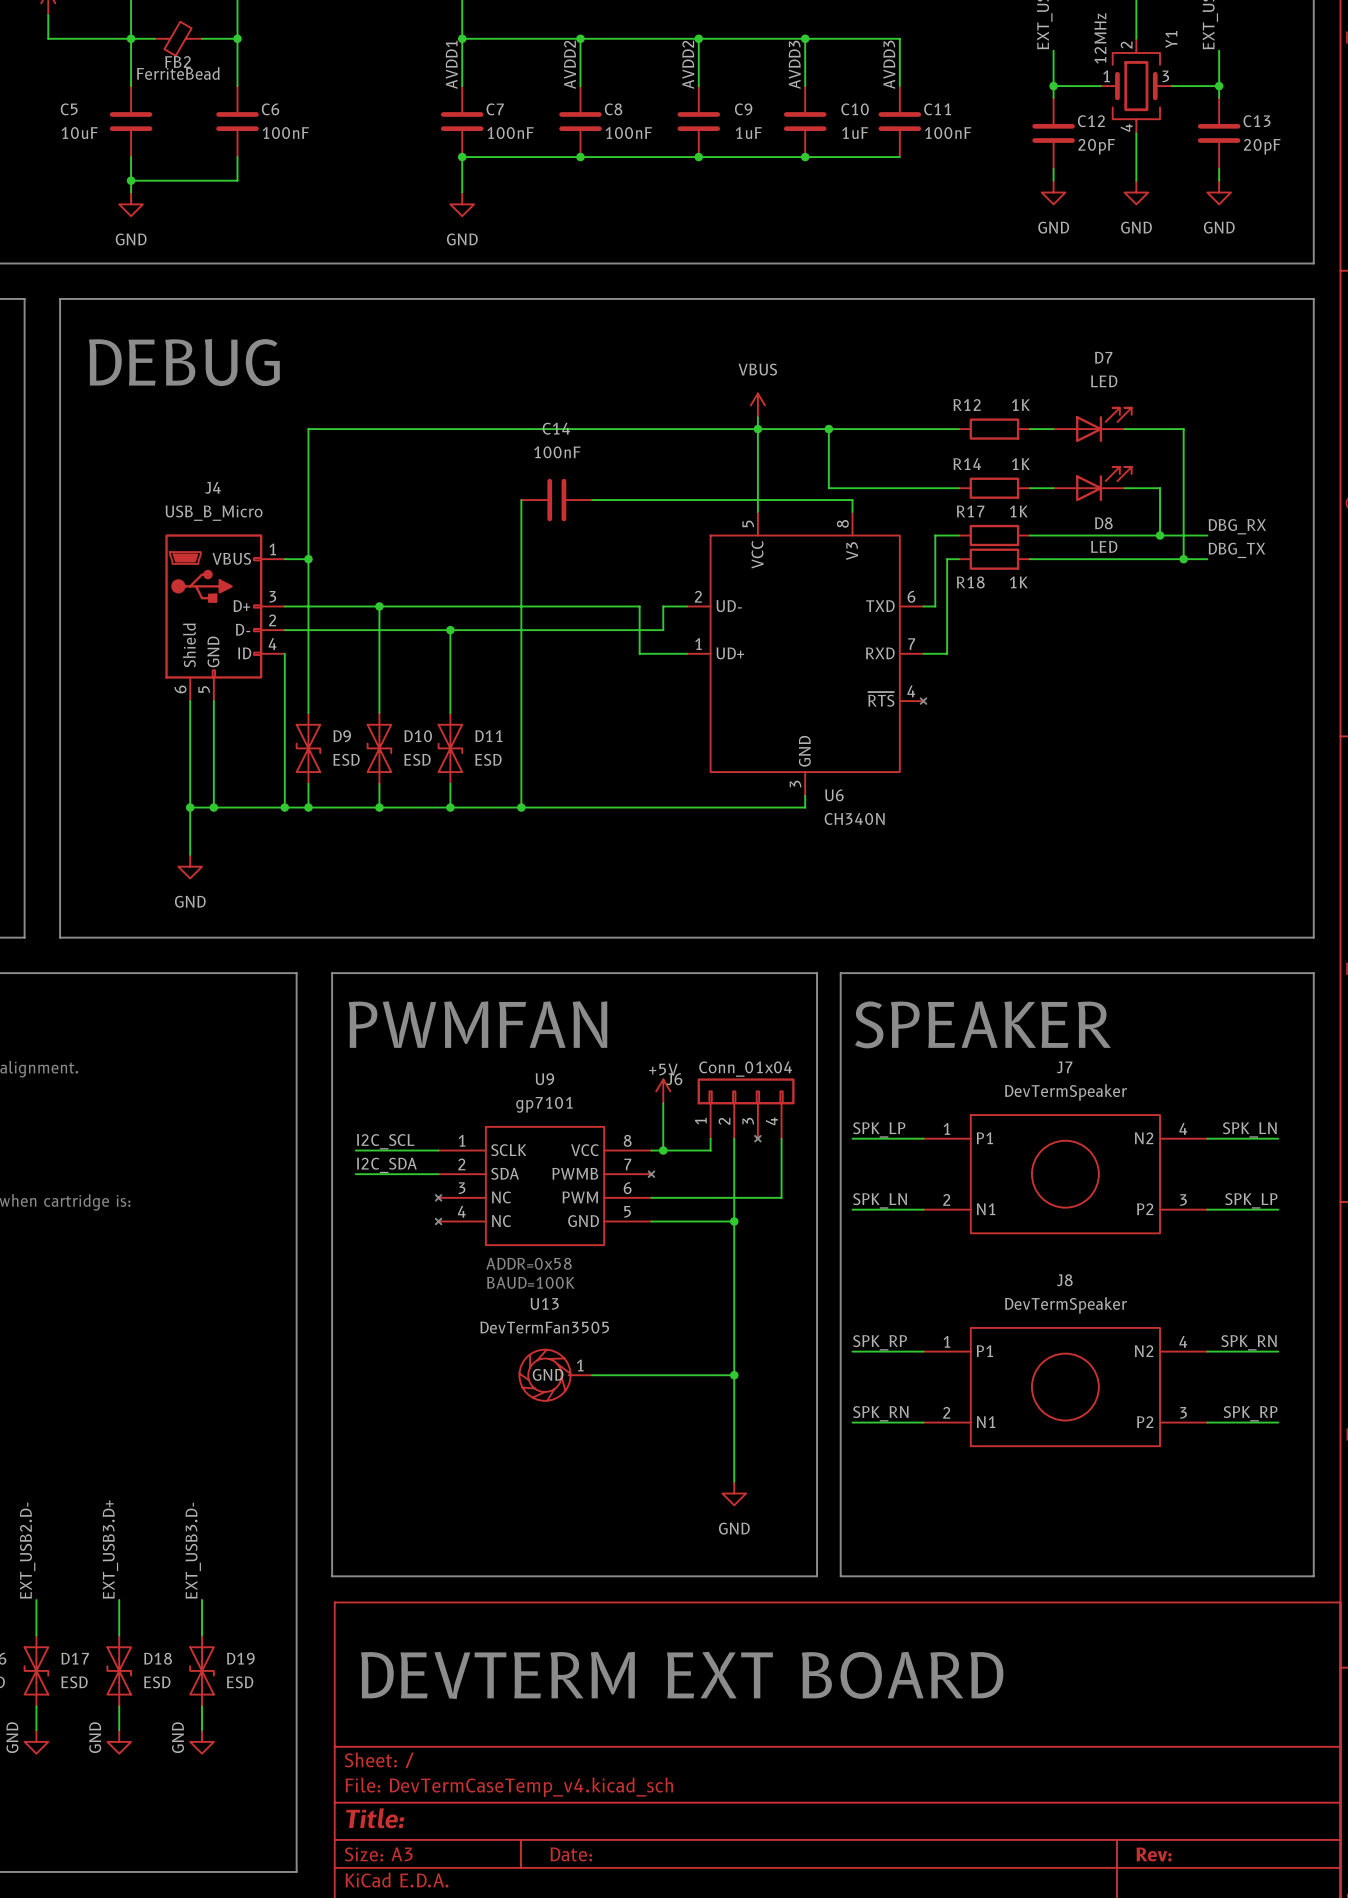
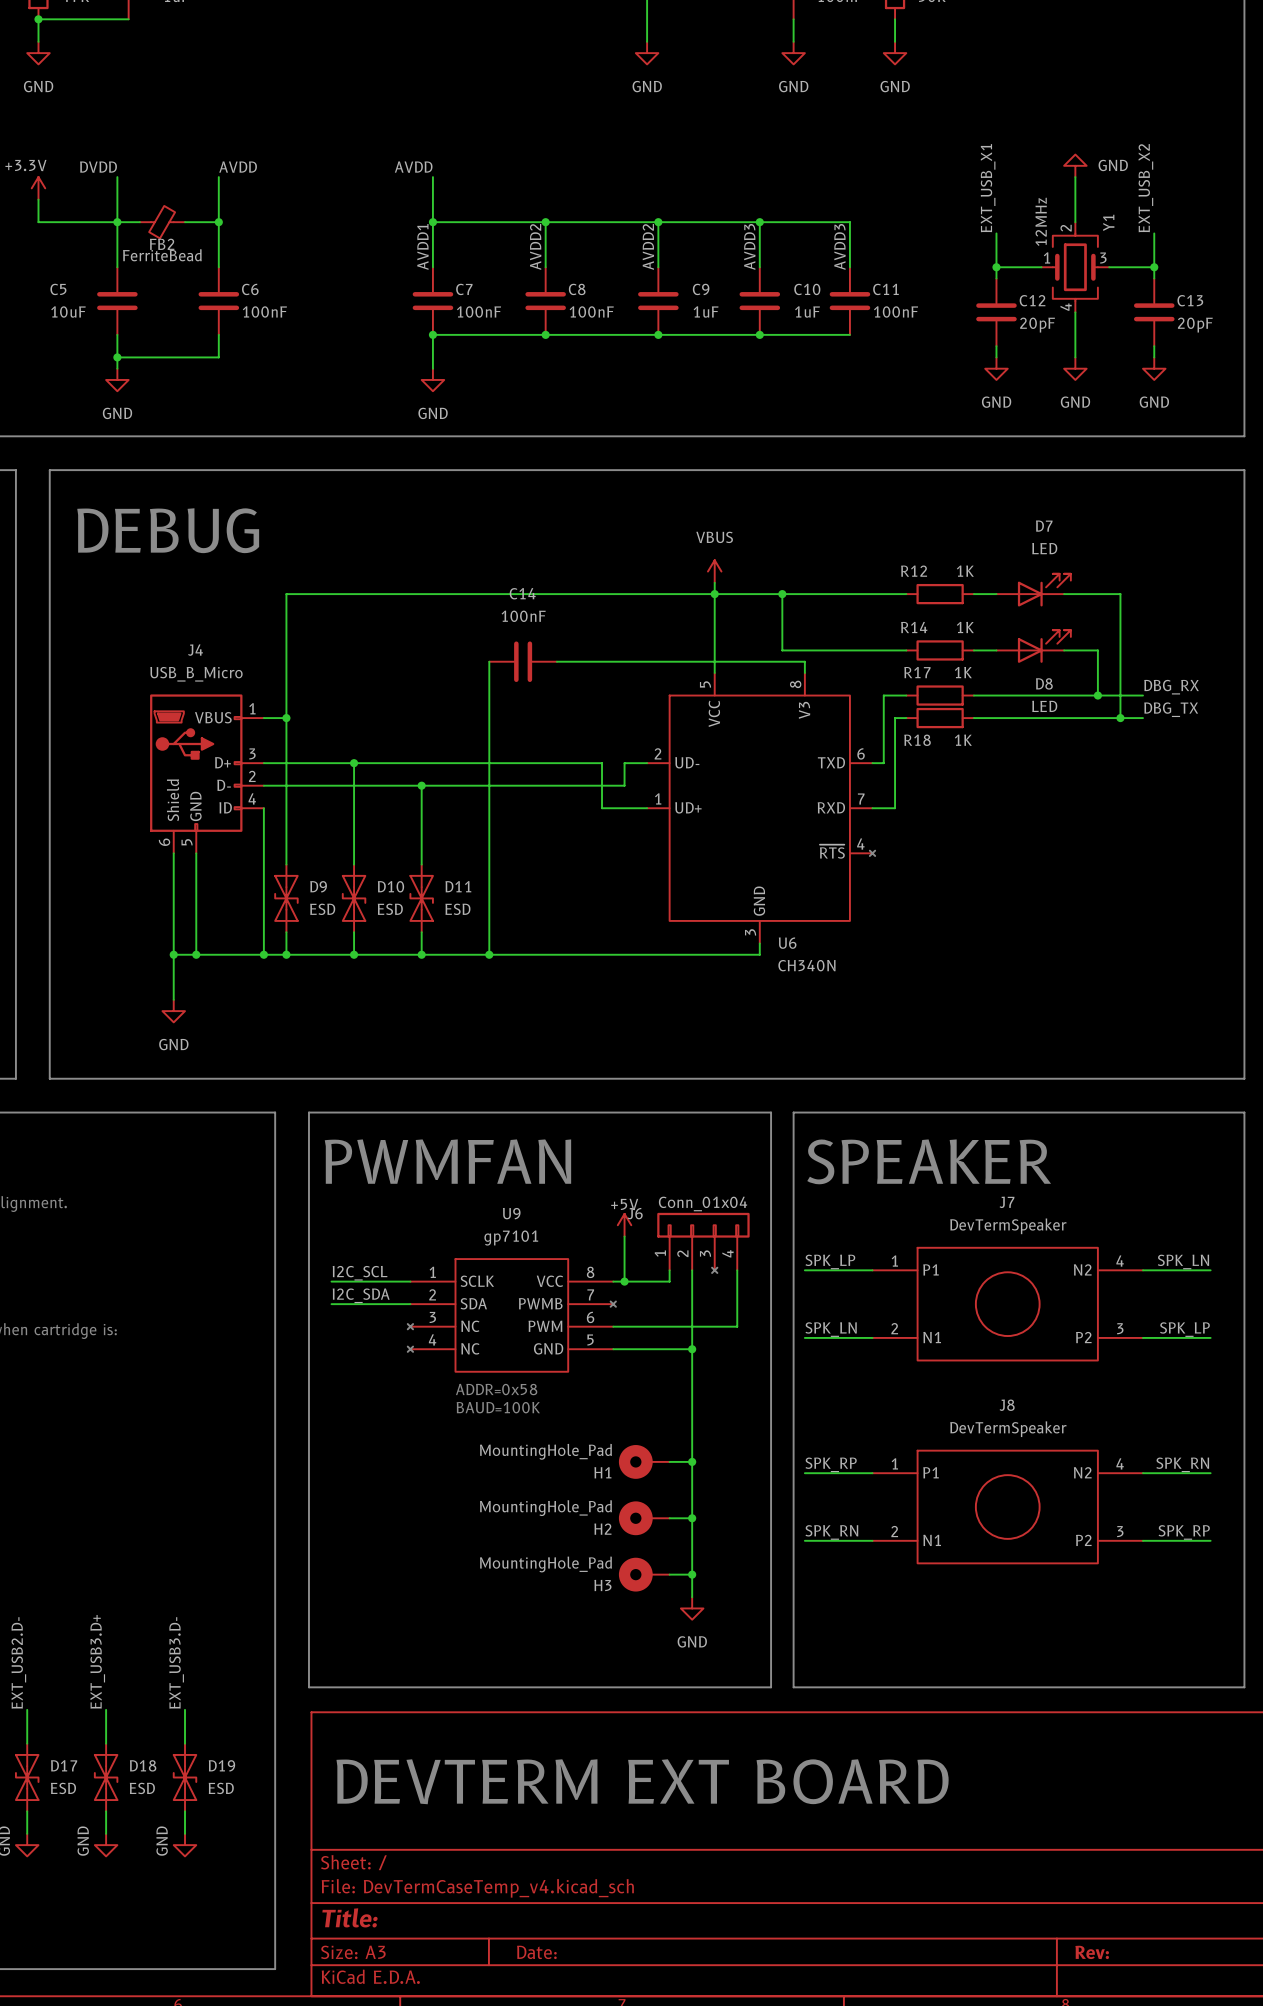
H1: none -> MountingHole_Pad (644, 1461)
wire: none -> (669, 1461) (692, 1461)
junction: none -> (692, 1461)
U13: DevTermFan3505 (555, 1375) -> none
wire: (592, 1375) (734, 1375) -> none
junction: (734, 1375) -> none
H2: none -> MountingHole_Pad (644, 1518)
wire: none -> (669, 1518) (692, 1518)
junction: none -> (692, 1518)
H3: none -> MountingHole_Pad (644, 1574)
wire: none -> (669, 1574) (692, 1574)
junction: none -> (692, 1574)

